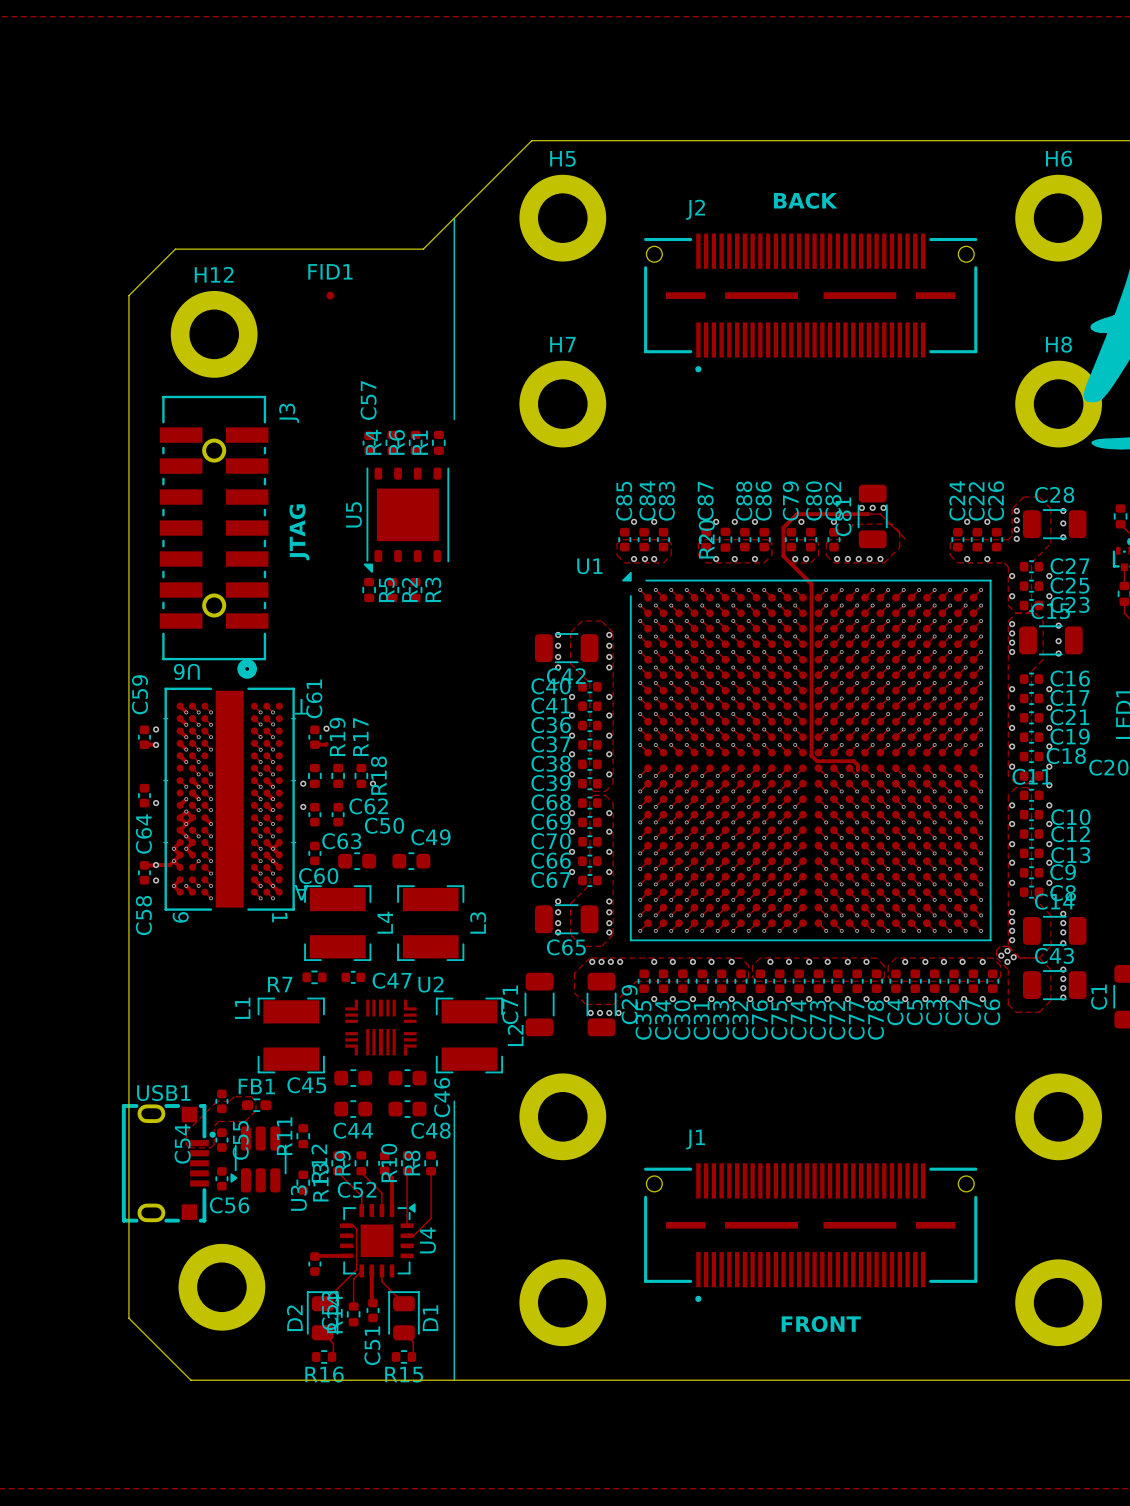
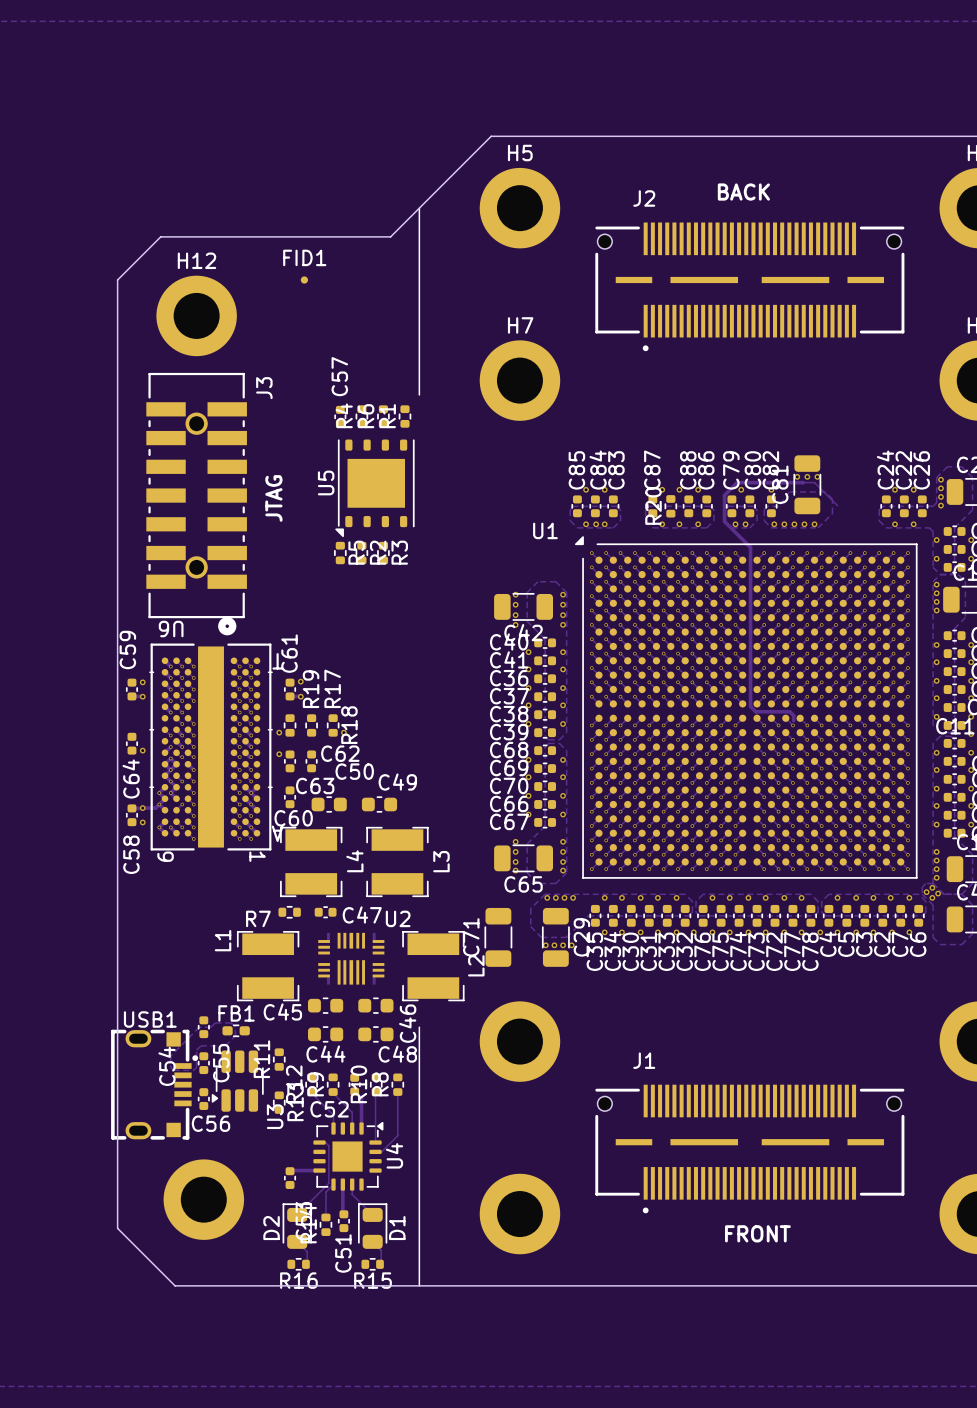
via: none -> (300, 696)

